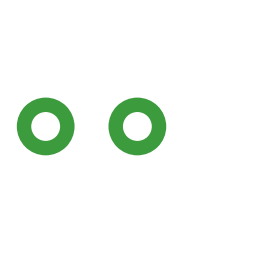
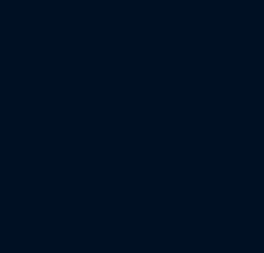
part: (91, 126) -> none

